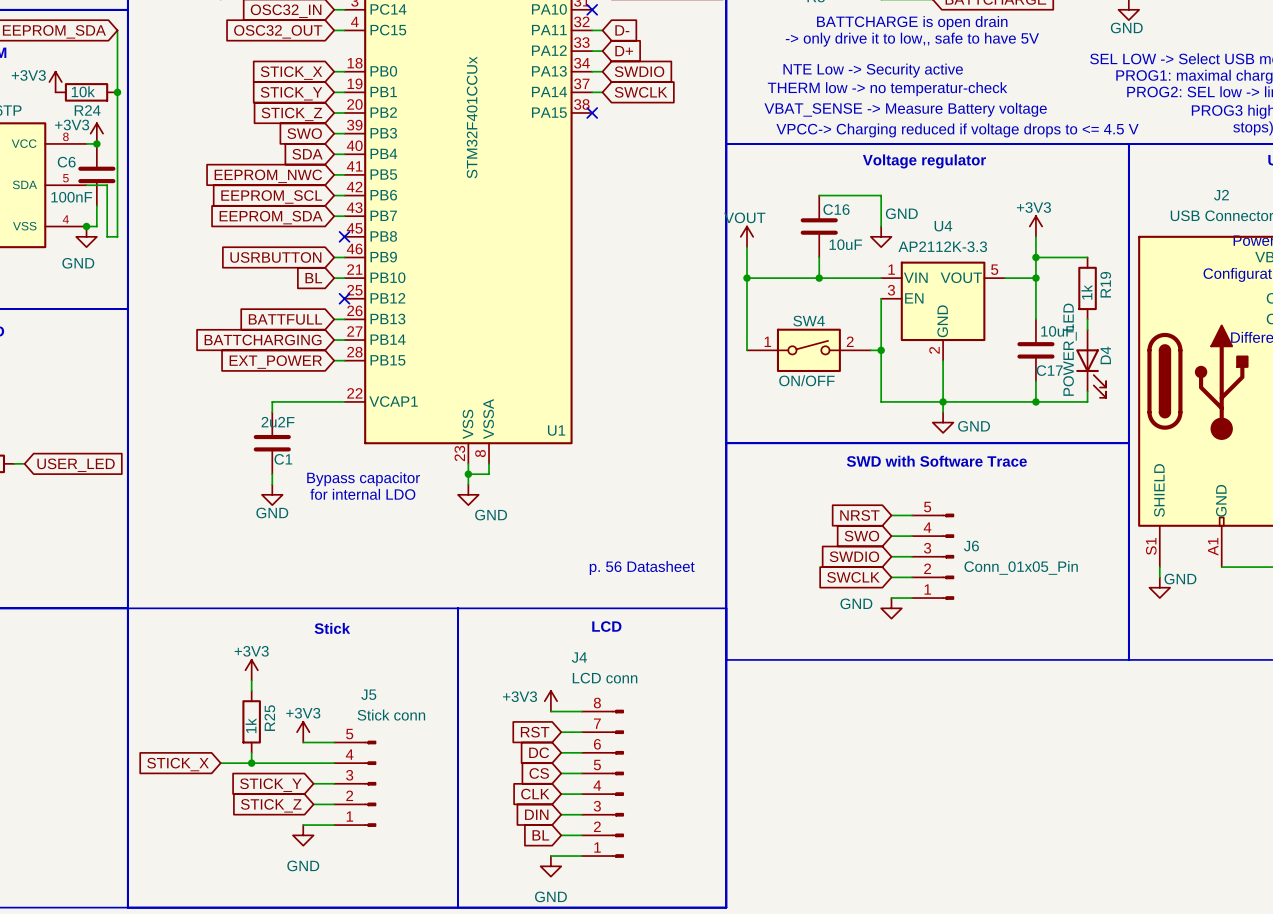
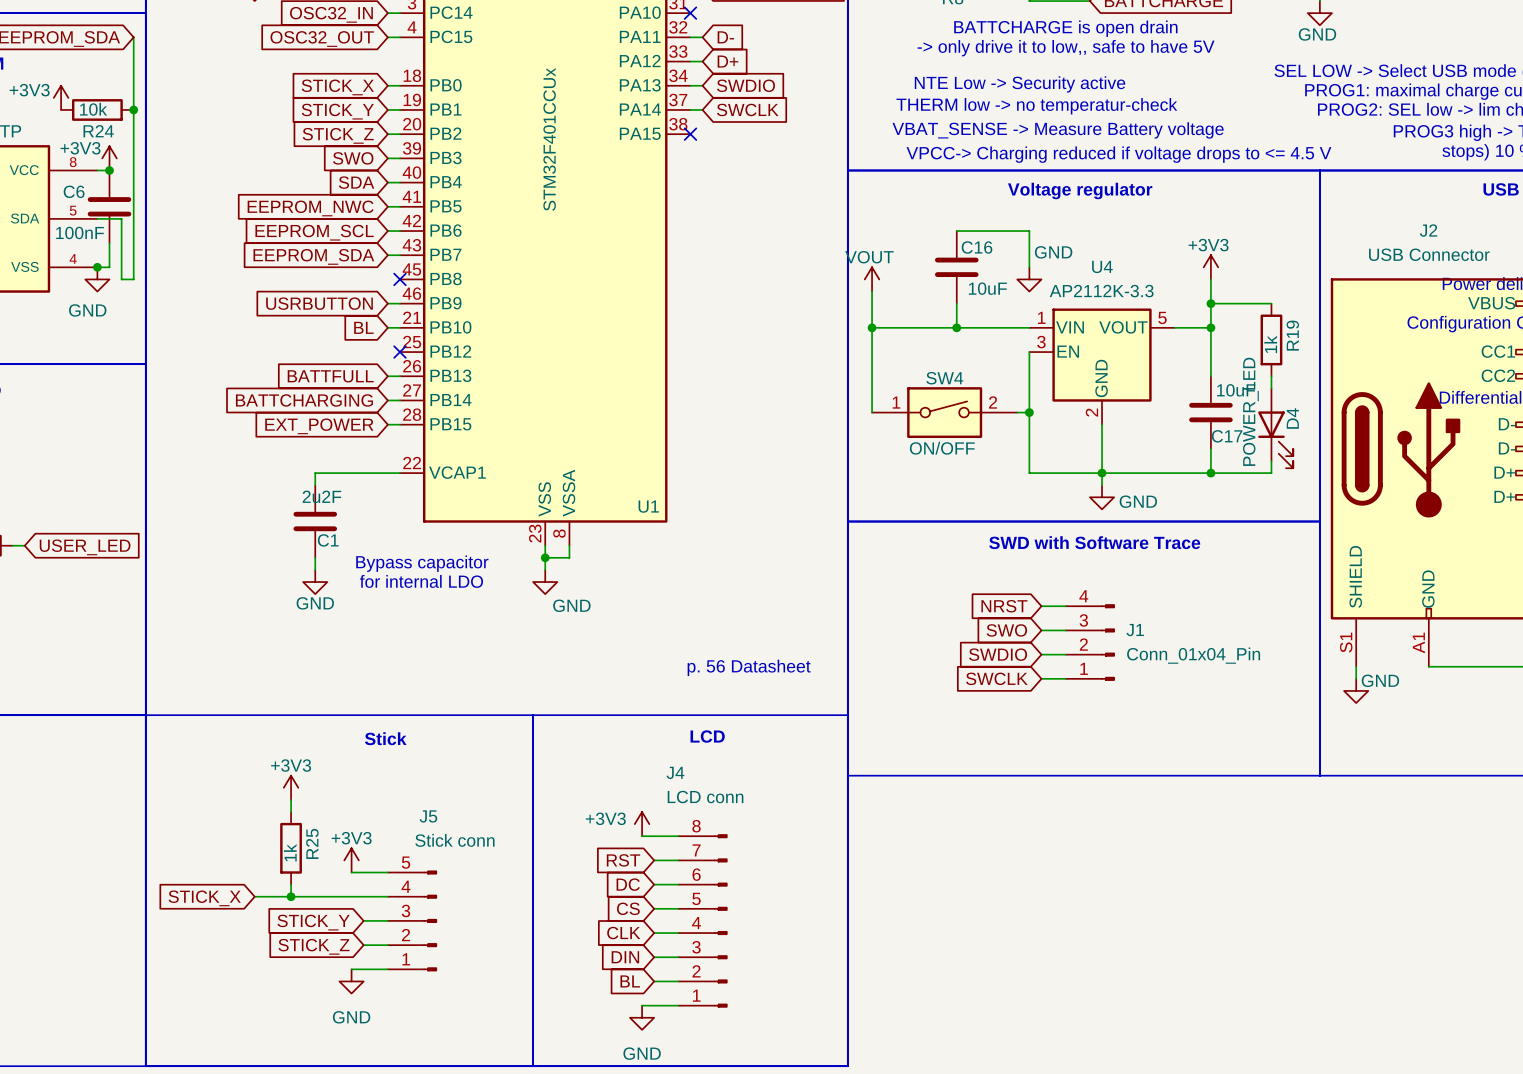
J1: none -> Conn_01x04_Pin (1090, 642)
J6: Conn_01x05_Pin (933, 556) -> none
wire: (891, 598) (912, 598) -> none
power symbol: GND (891, 608) -> none

